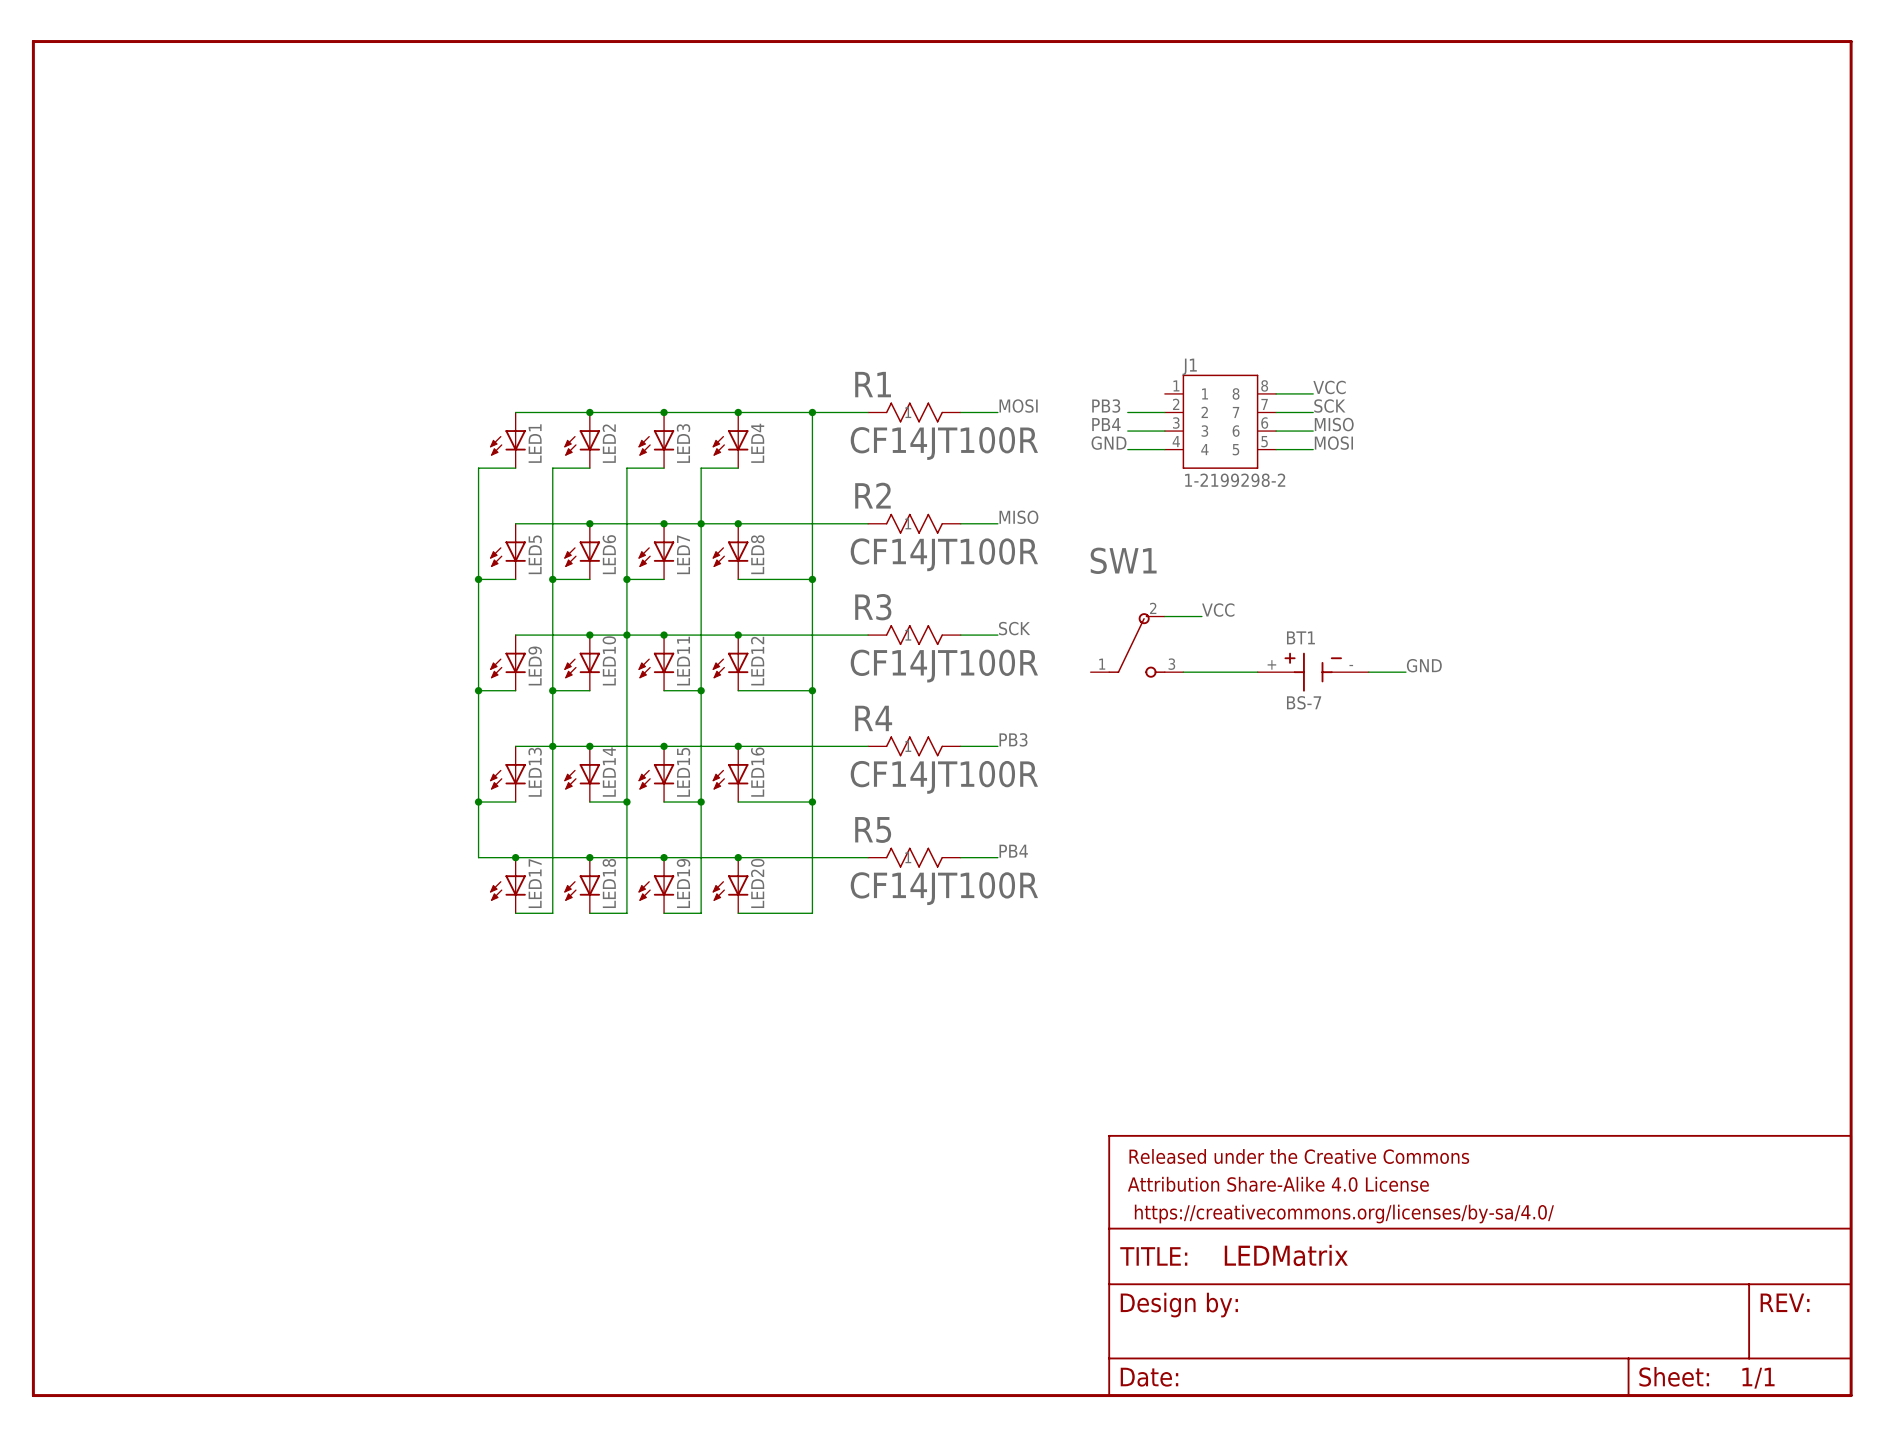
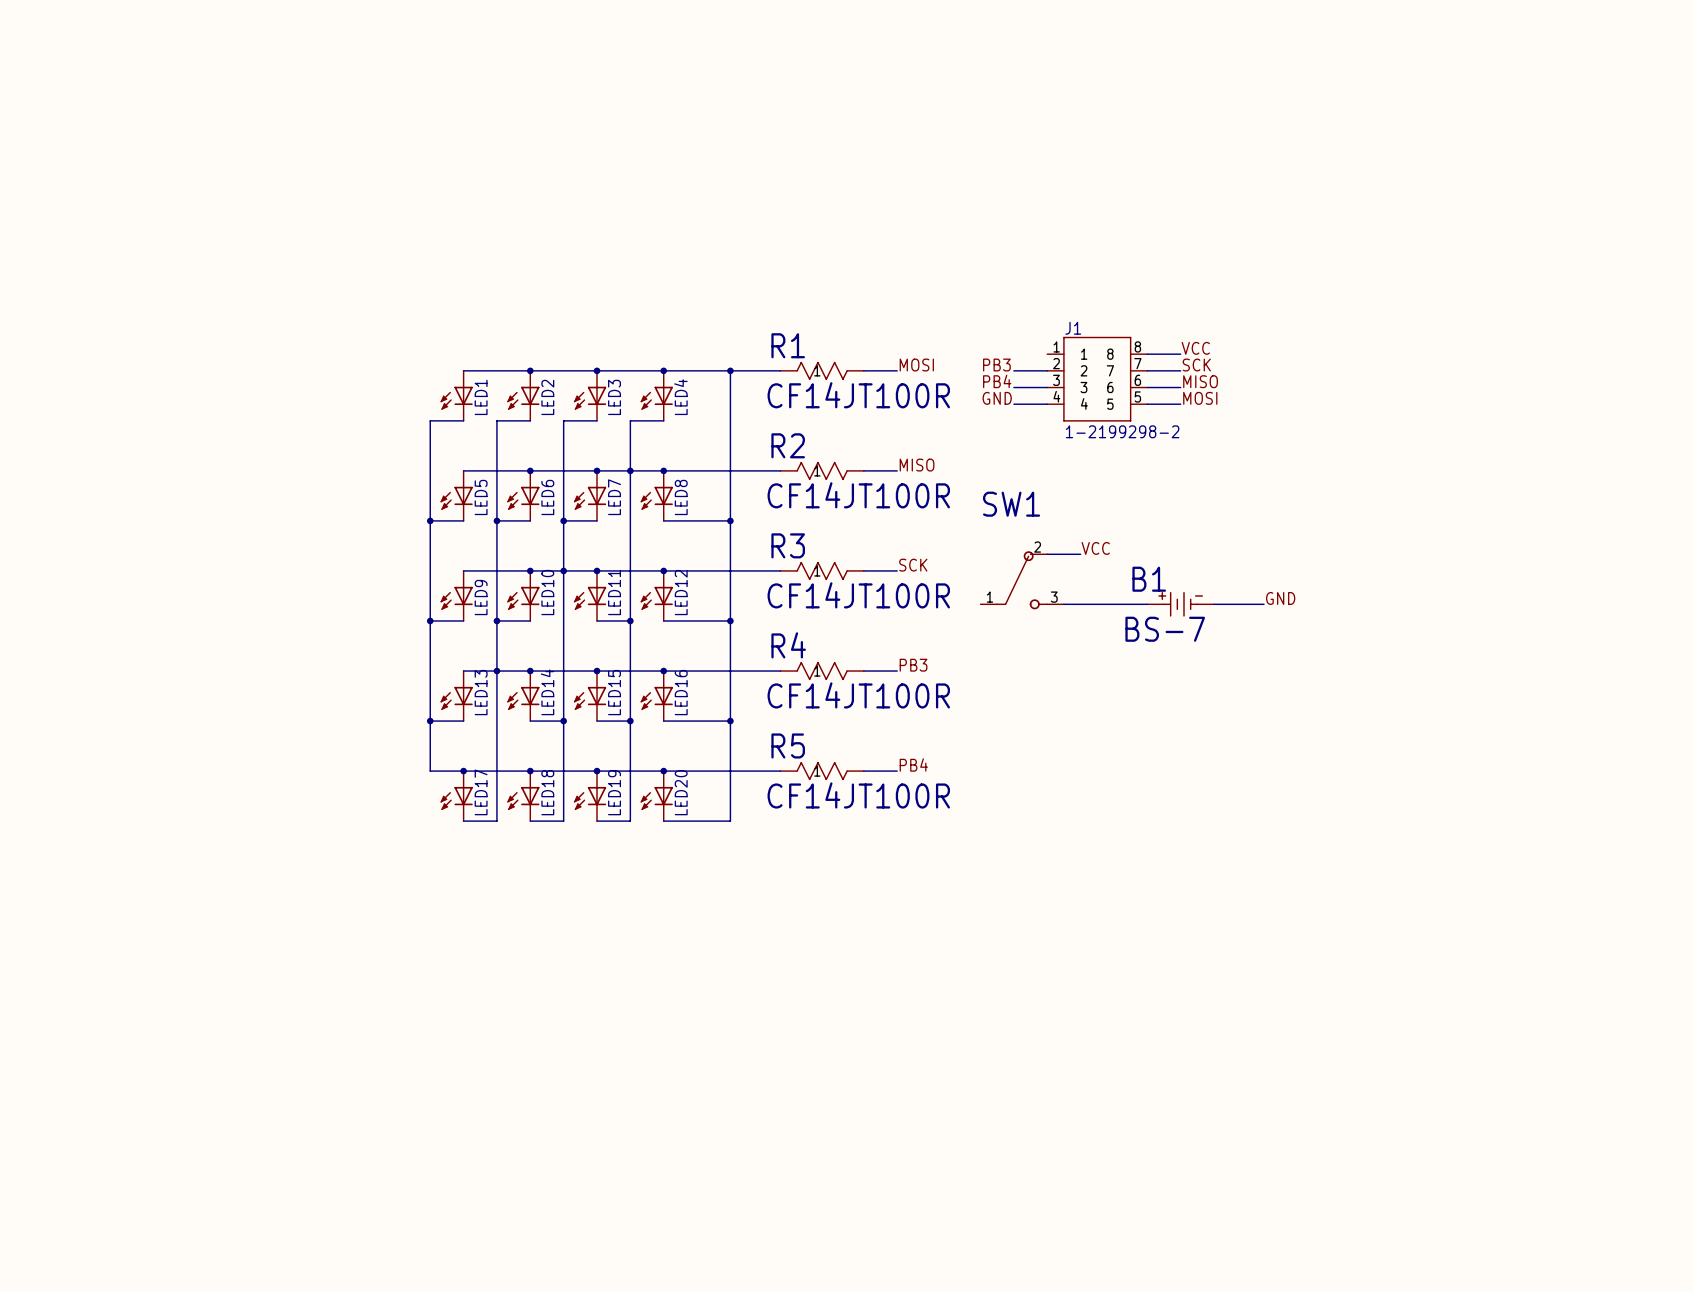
BT1: BS-7 (1313, 672) -> none
B1: none -> BS-7 (1180, 604)
part: (942, 718) -> none
part: (1480, 1265) -> none

